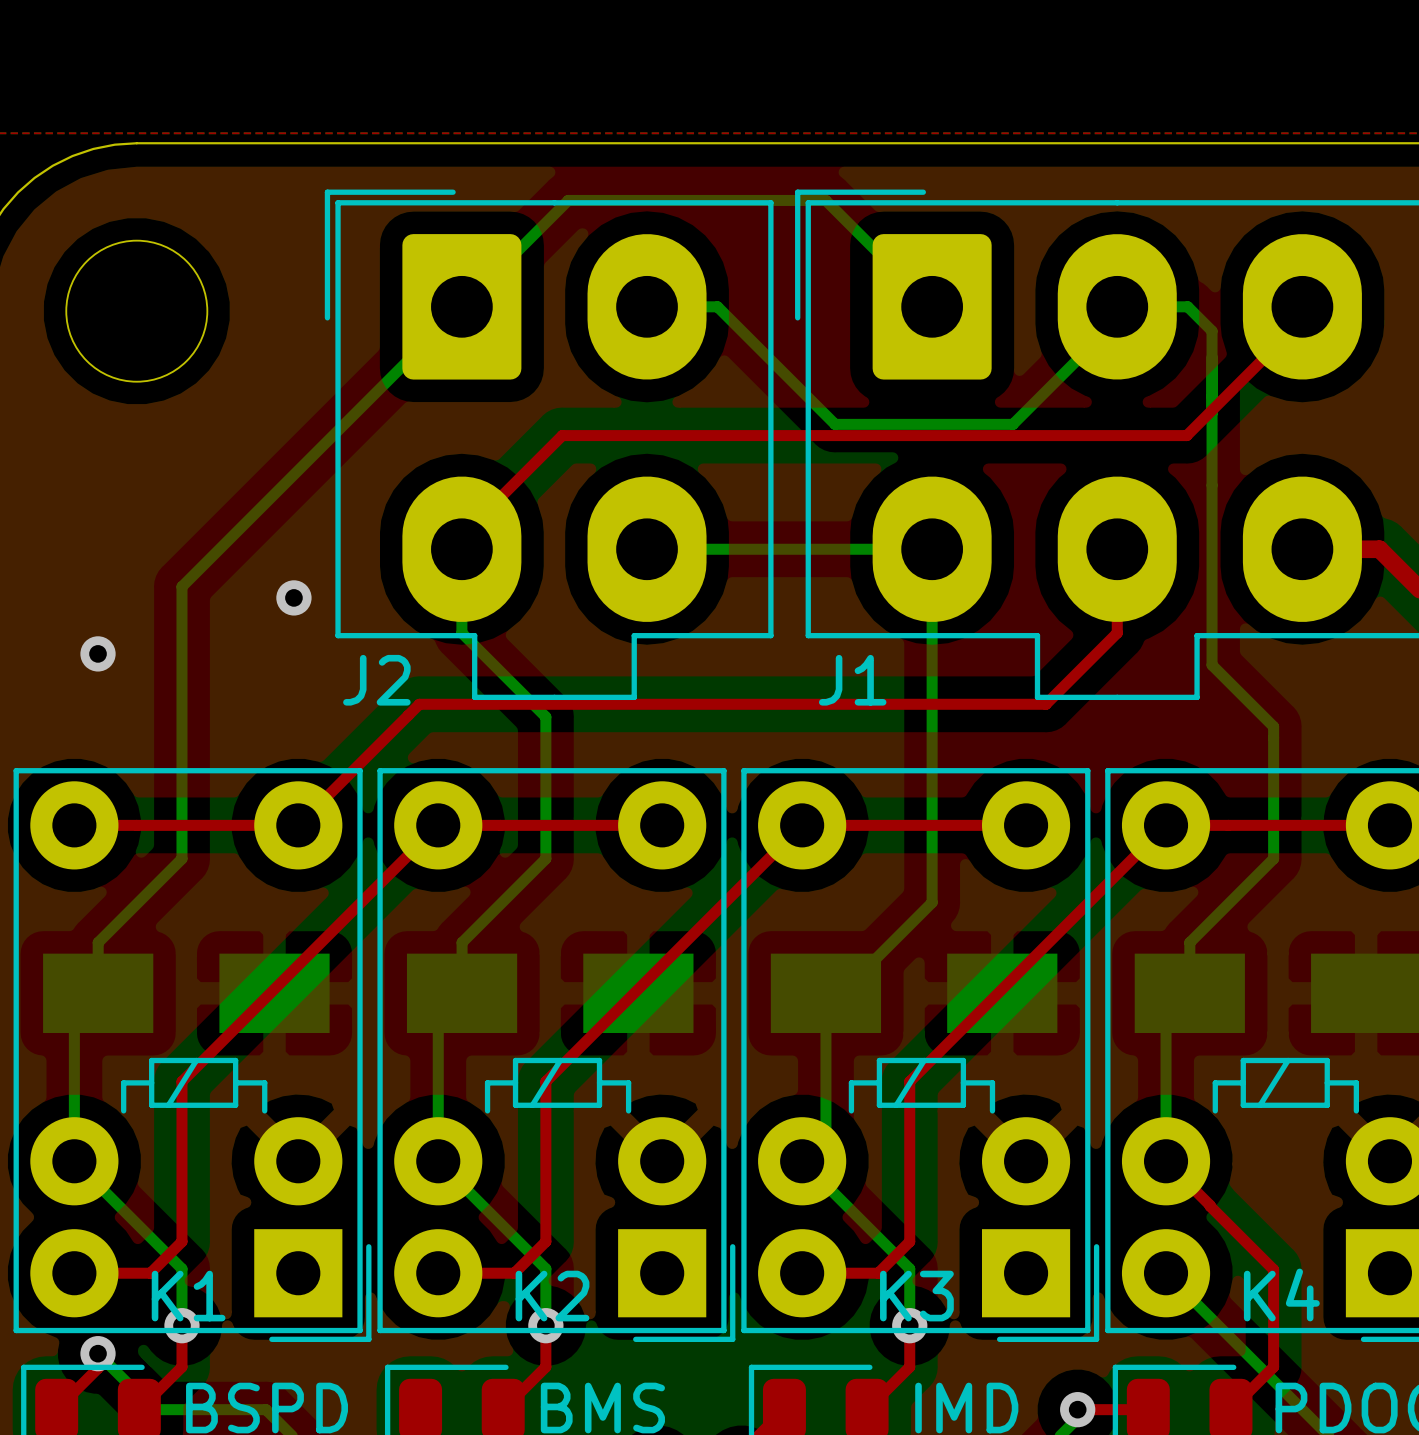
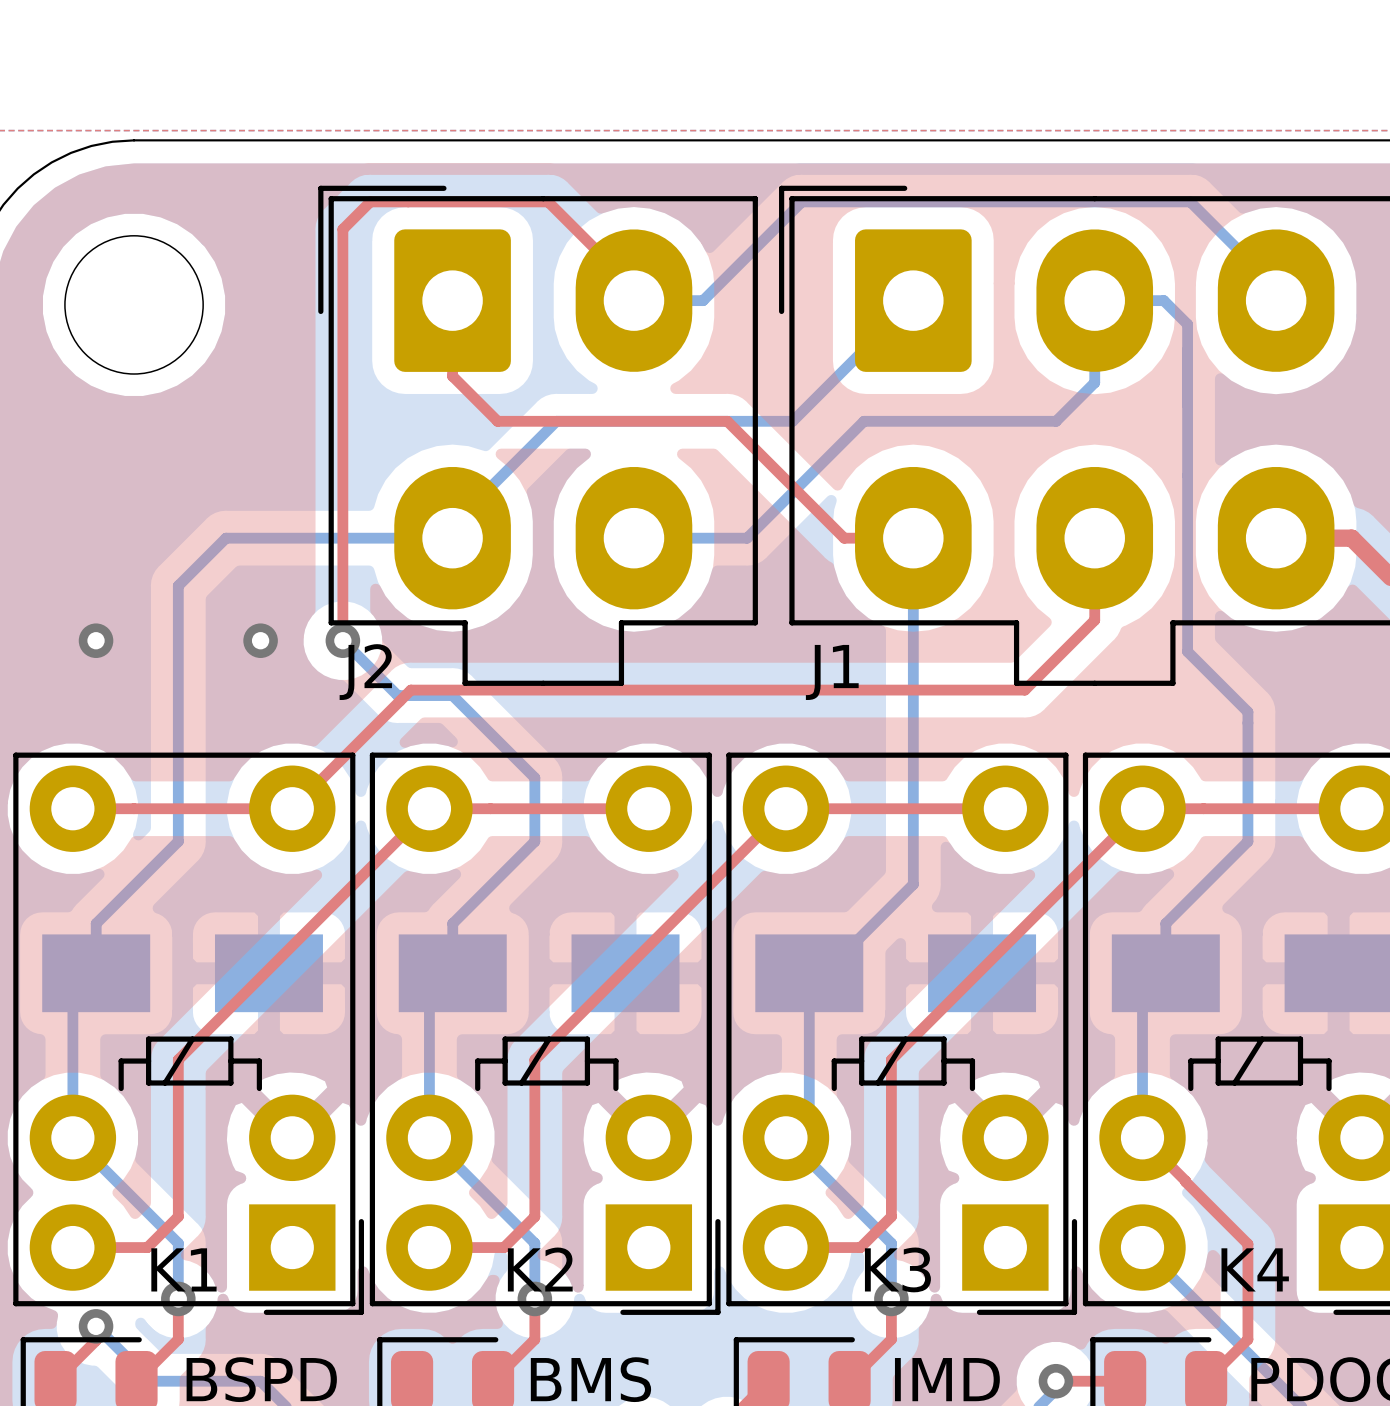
top track: none -> (452, 300) (452, 376) (497, 421) (727, 421) (844, 538) (913, 538)
top track: none -> (633, 300) (633, 287) (548, 201) (370, 201) (342, 229) (342, 640)
bottom track: (717, 306) (835, 424) (1012, 424) (1117, 320) -> (703, 300) (801, 201) (1190, 201) (1276, 287) (1276, 300)
bottom track: (932, 306) (825, 200) (568, 200) (181, 586) (181, 597) -> (913, 300) (792, 421) (556, 421) (452, 525) (452, 538) (225, 538) (178, 585)
top track: (1302, 320) (1186, 435) (562, 435) (461, 536) -> none
bottom track: (461, 549) (461, 633) (545, 716) (545, 793) -> (342, 640) (397, 695) (452, 695) (534, 777)
bottom track: (762, 549) (932, 549) -> (747, 538) (863, 421) (1056, 421) (1094, 382) (1094, 313)
via: (293, 597) -> none
via: none -> (260, 640)
via: none -> (342, 640)

